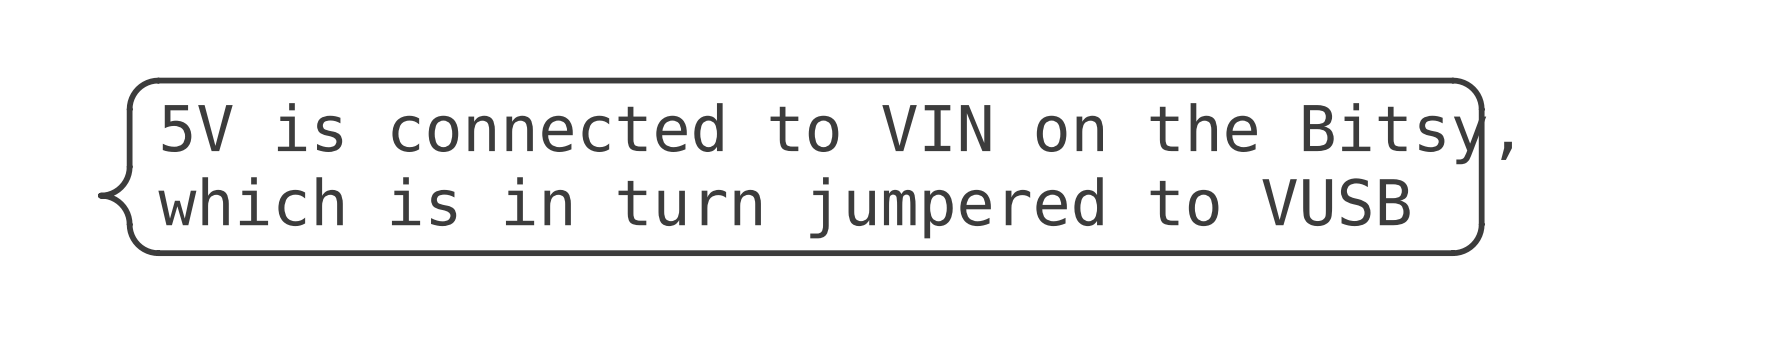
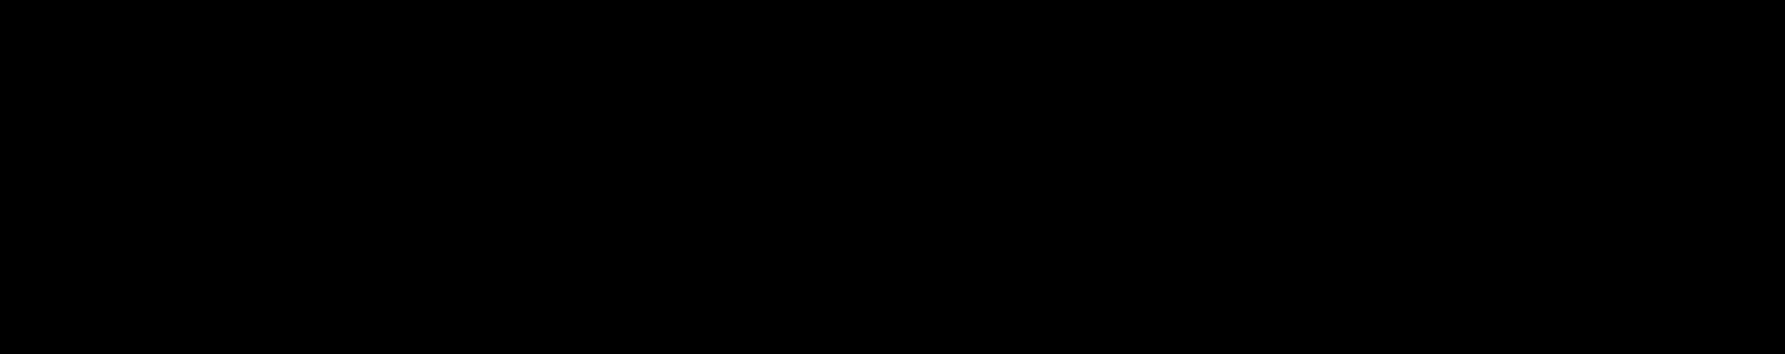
line: (1452, 80) (154, 80) (140, 86) (130, 101) (129, 166) (127, 177) (118, 189) (100, 195) (111, 197) (123, 206) (128, 216) (131, 235) (138, 244) (147, 250) (158, 253) (1456, 252) (1473, 244) (1481, 228) (1481, 109) (1479, 98) (1473, 88) (1463, 82) (1452, 80) -> none
text: 5V is connected to VIN on the Bitsy, (837, 133) -> none
text: which is in turn jumpered to VUSB (784, 207) -> none

